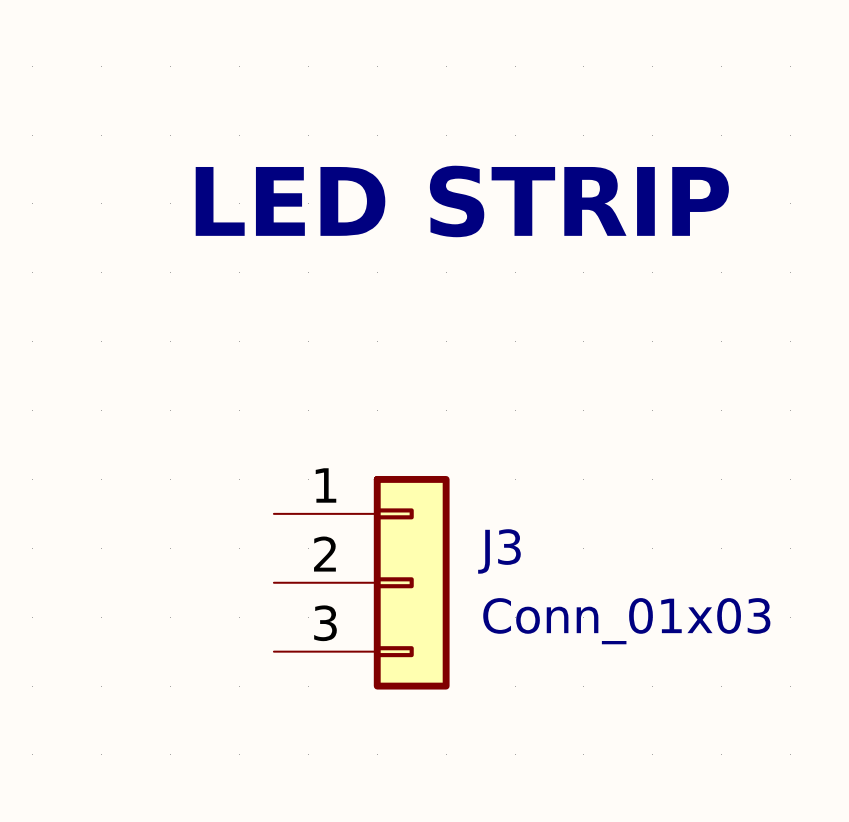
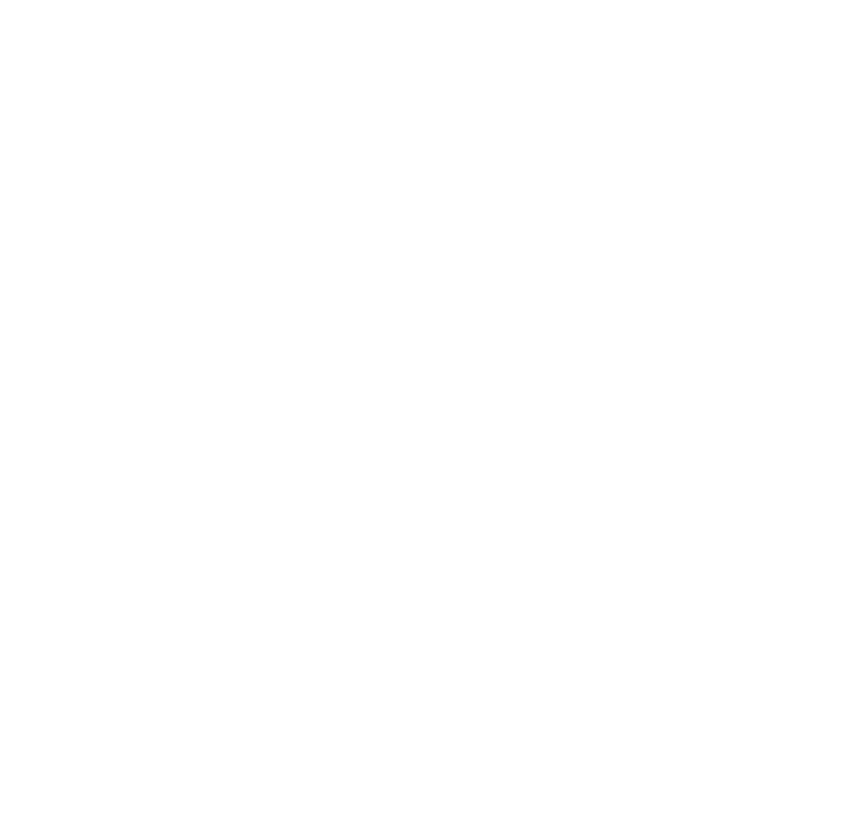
text: LED STRIP (462, 201) -> none
J3: Conn_01x03 (361, 582) -> none

